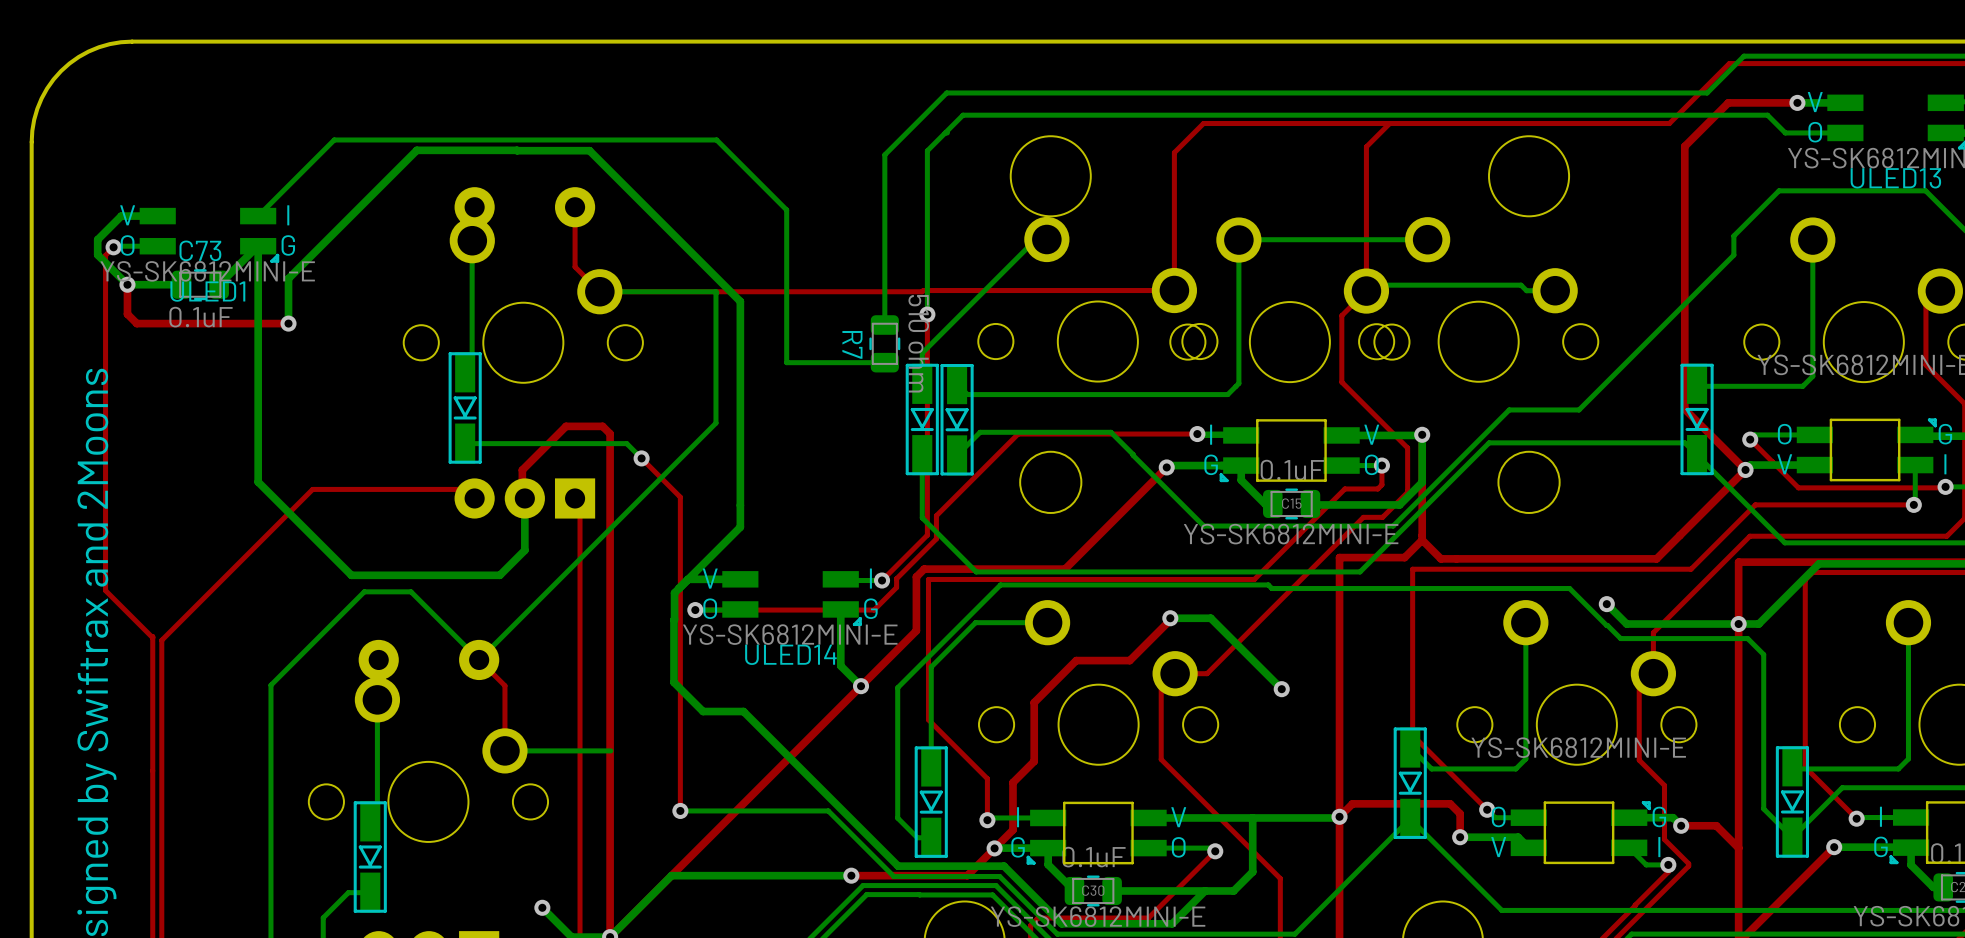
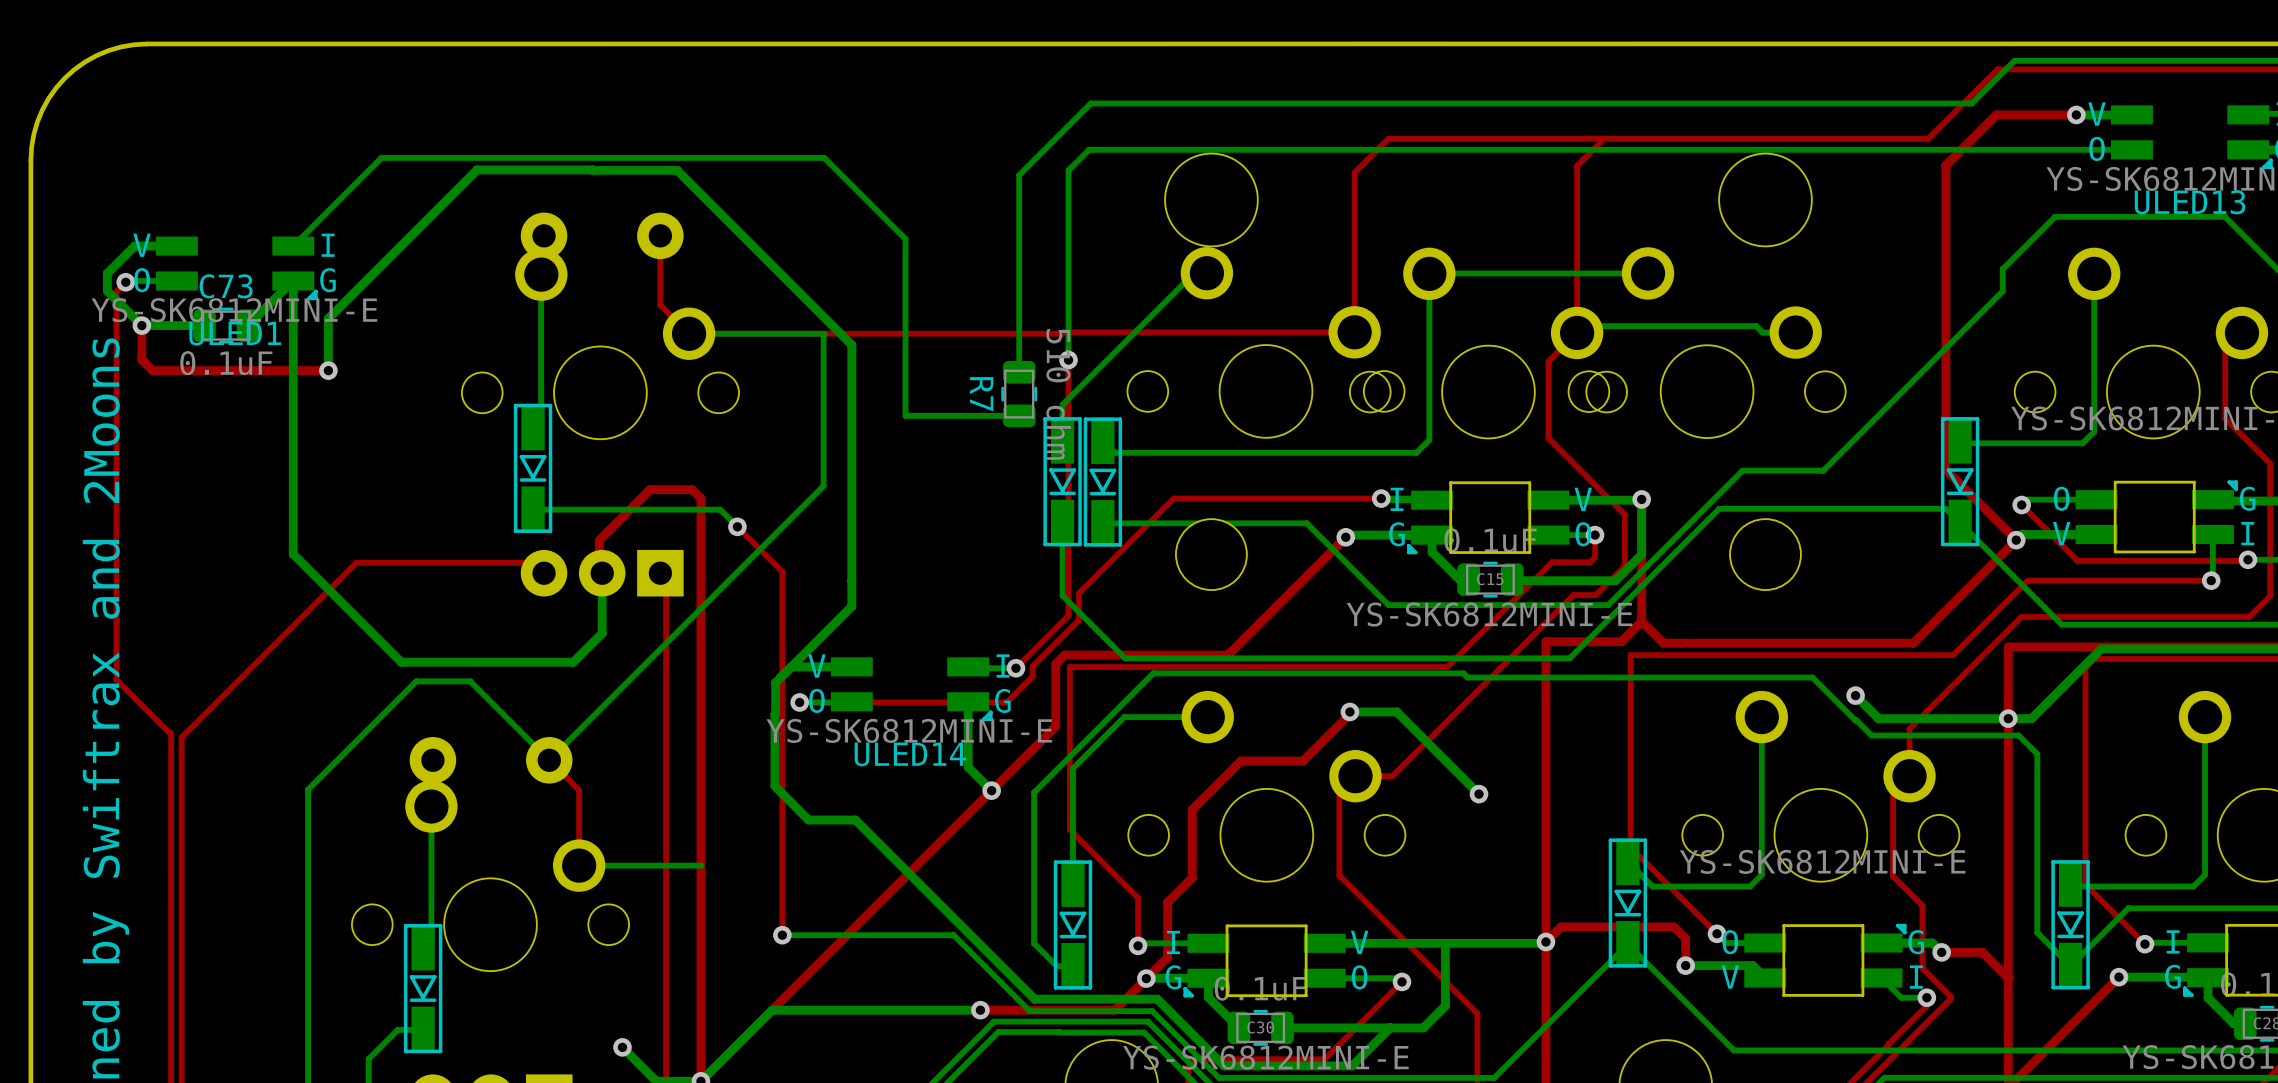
bottom track: (1785, 132) (1767, 115) (963, 115) (945, 132) -> (2062, 149) (1091, 149)
bottom track: (1133, 455) (1110, 432) (980, 432) (957, 455) -> (1306, 523) (1102, 523)

